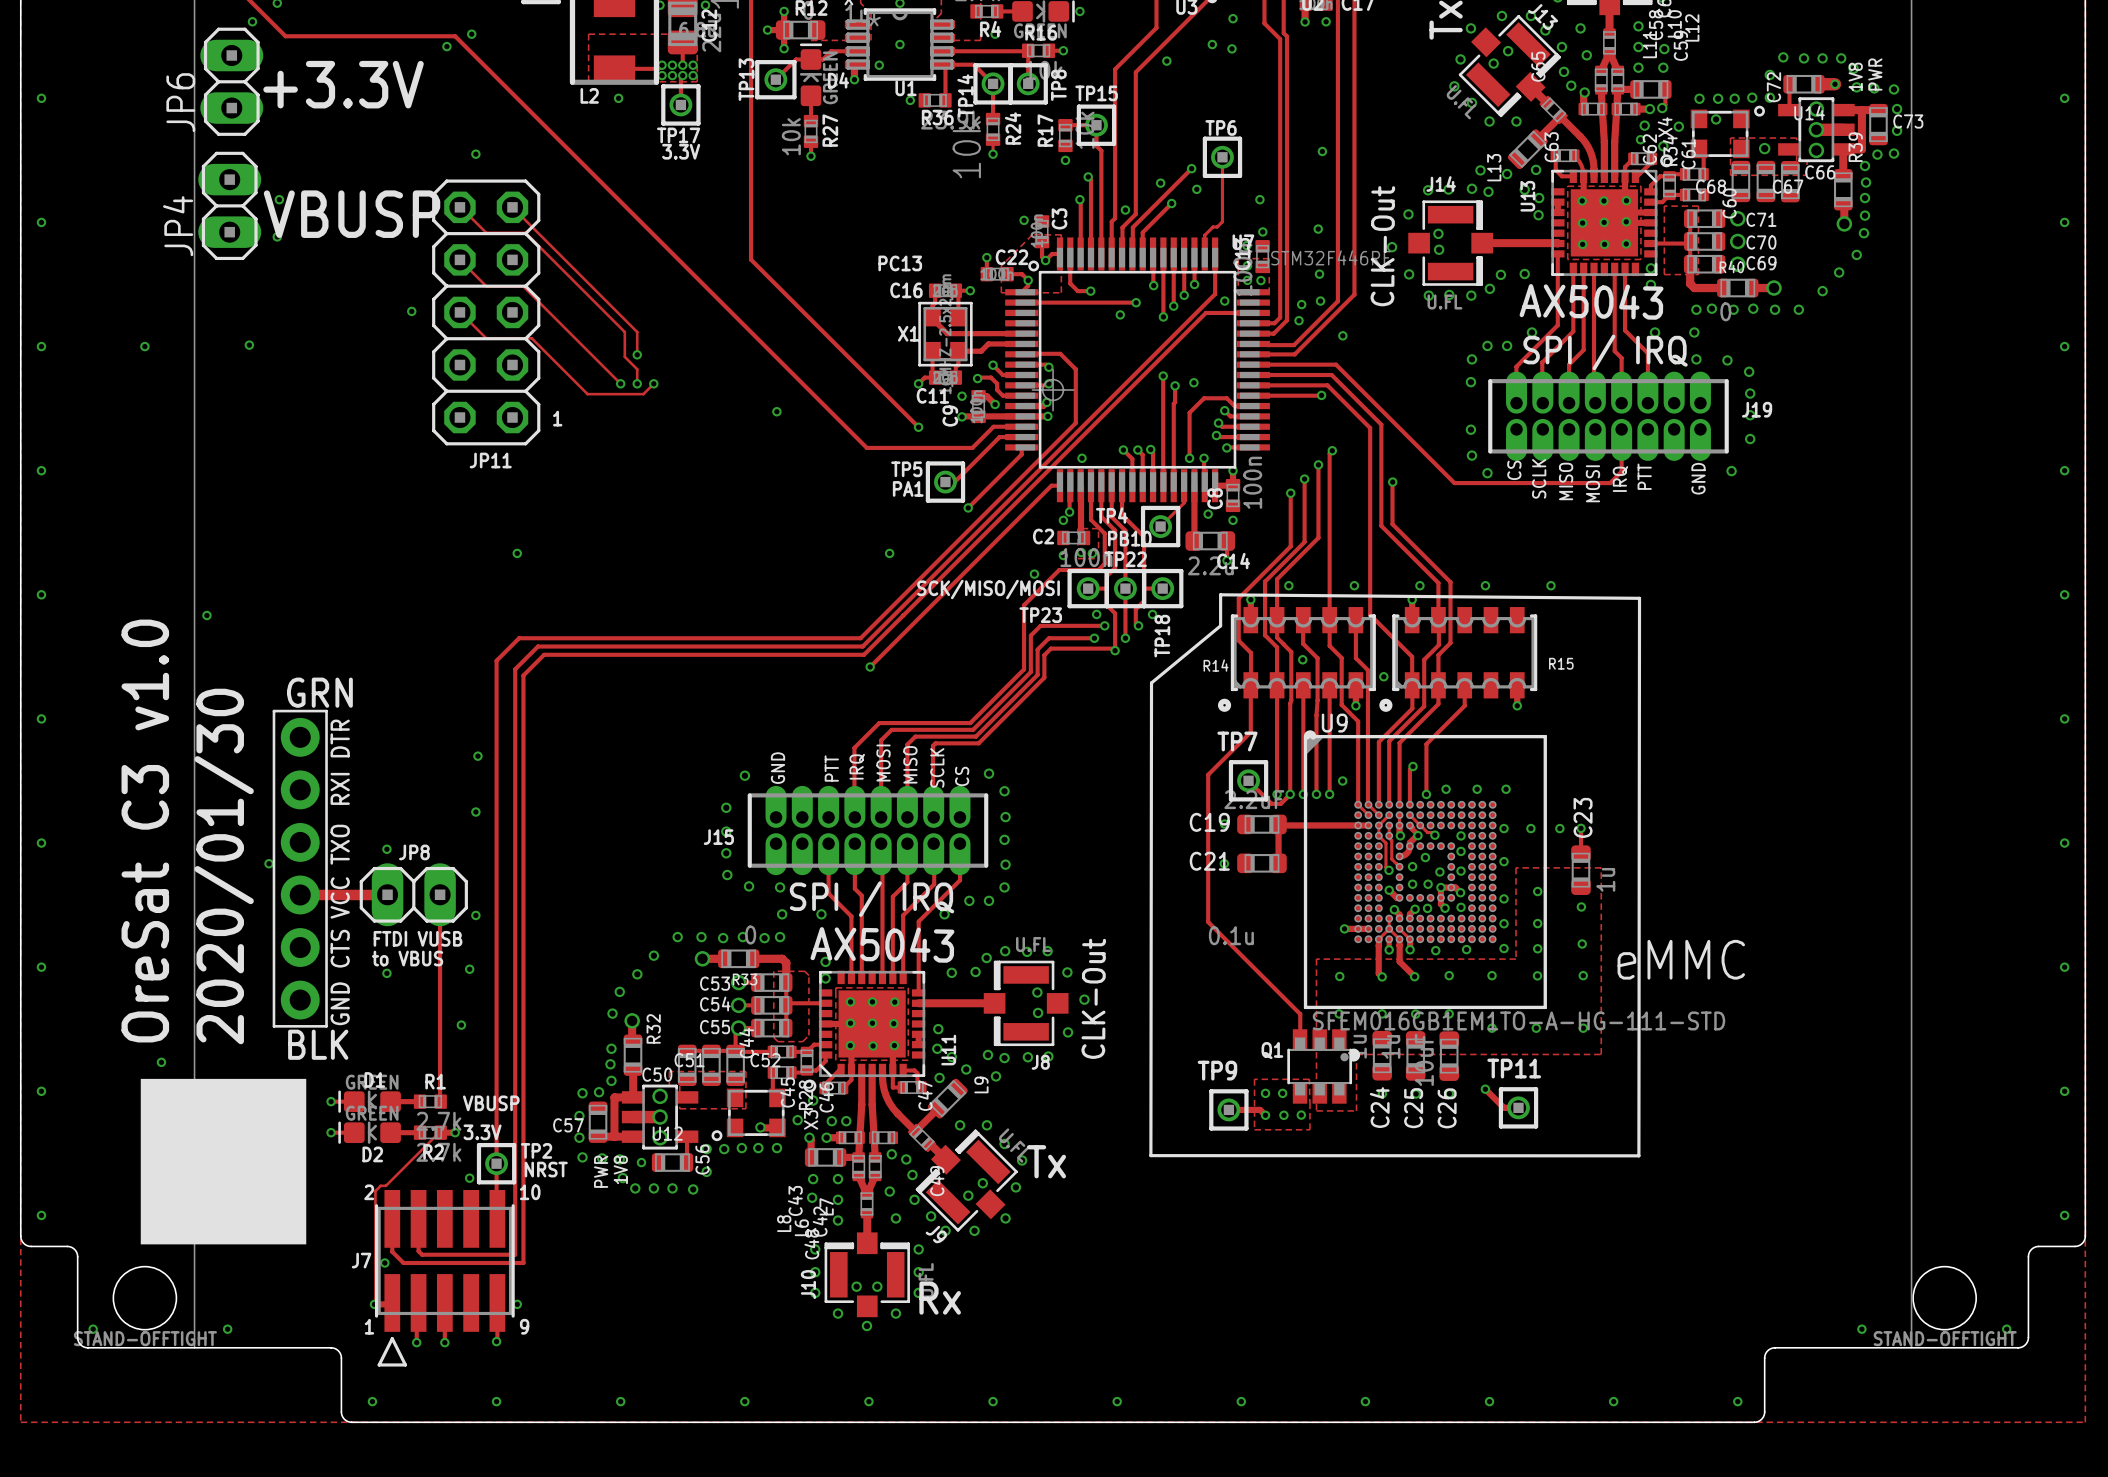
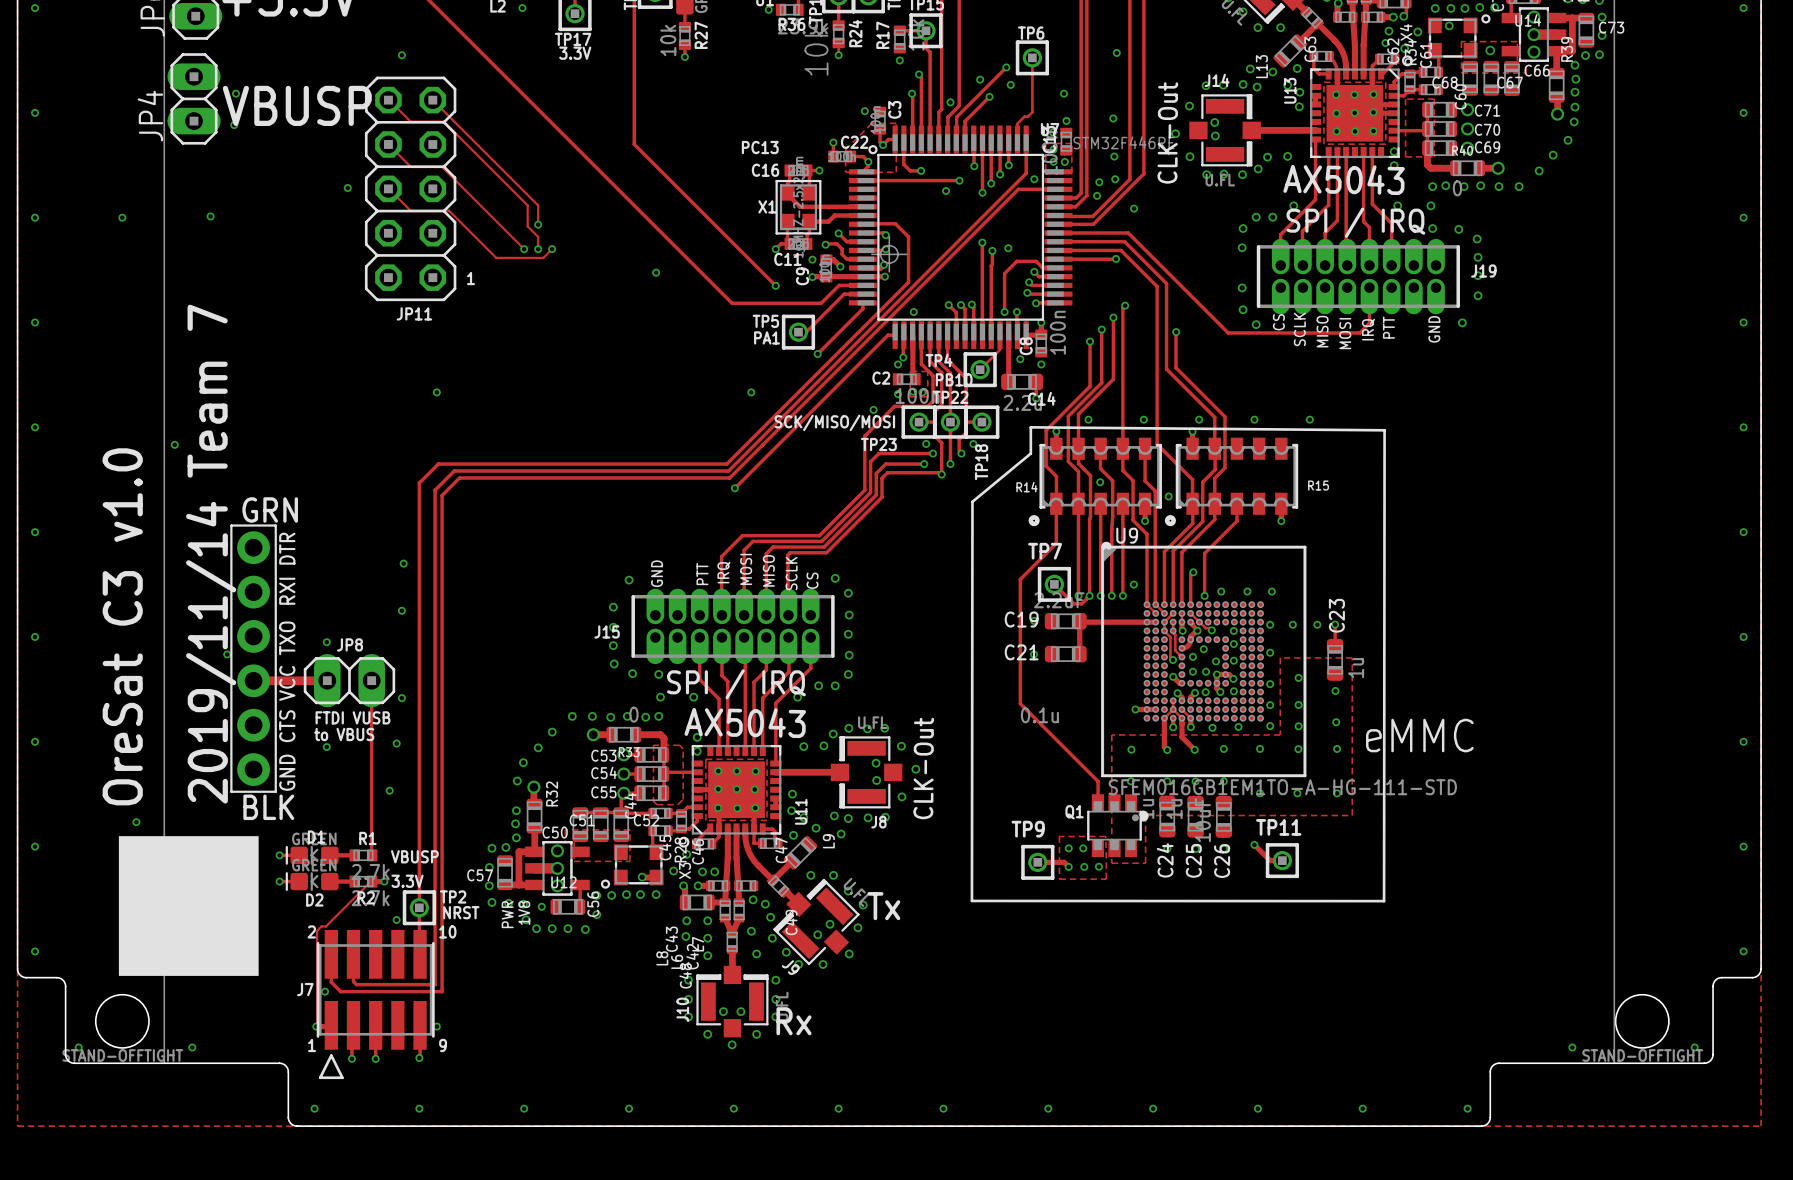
text: none -> Team 7 (207, 391)
text: none -> 2019/11/14 (211, 652)
text: 2020/01/30 (224, 866) -> none

